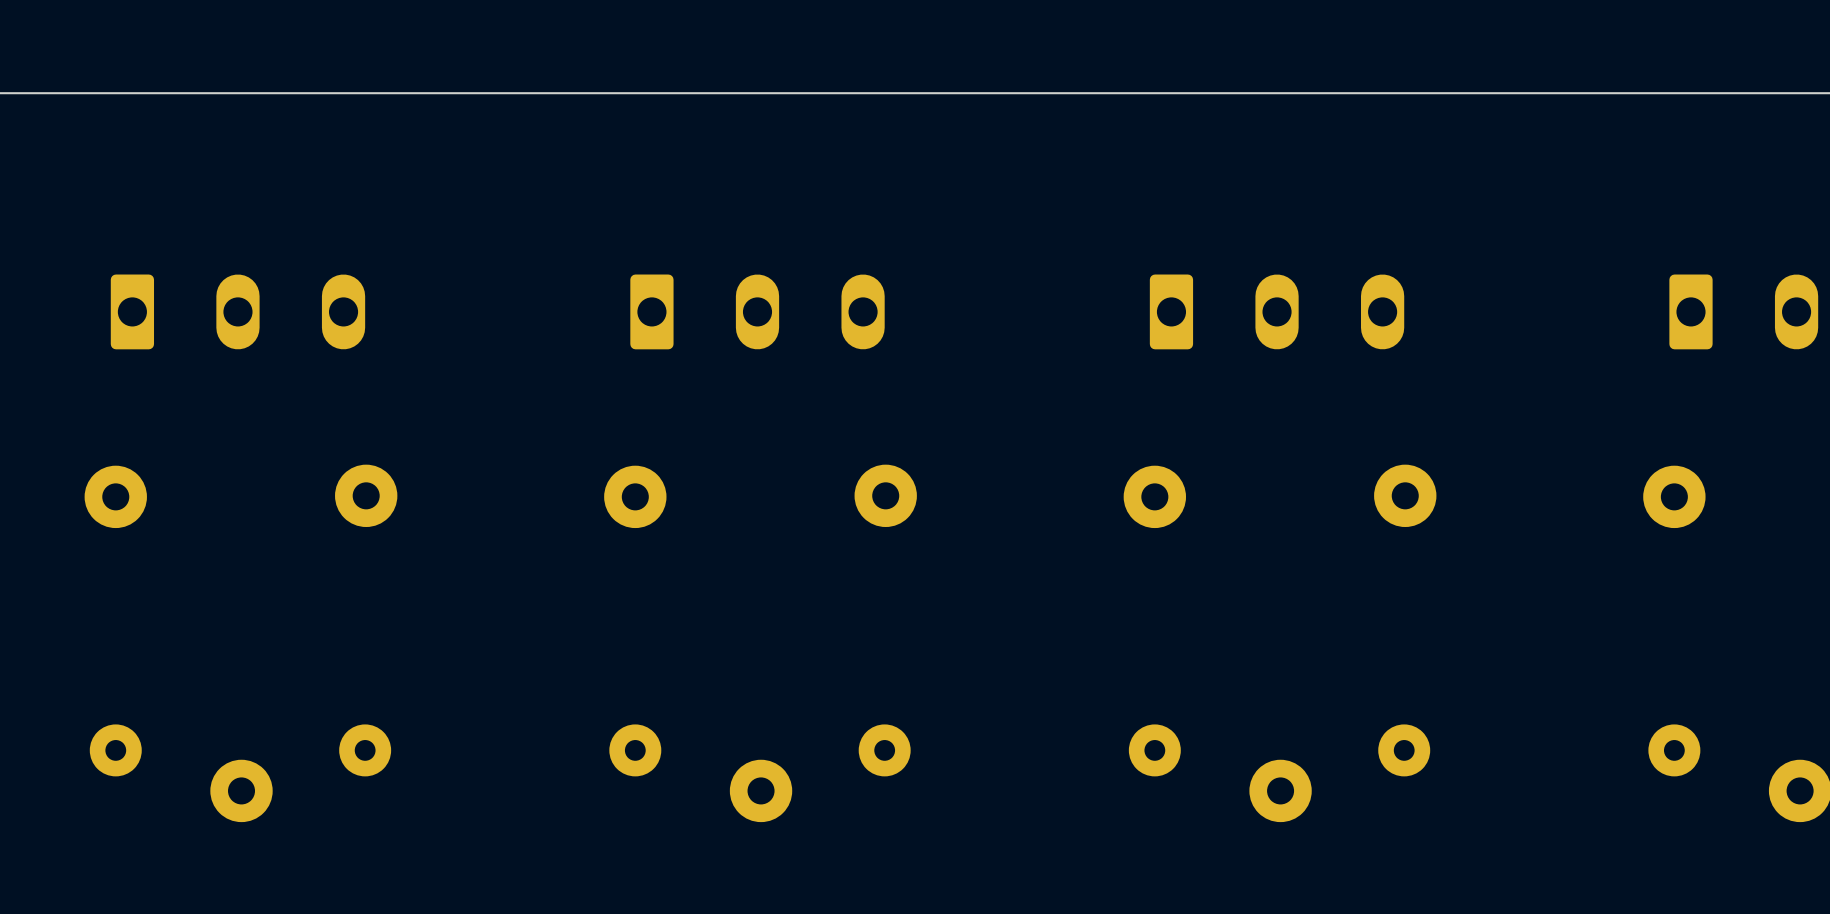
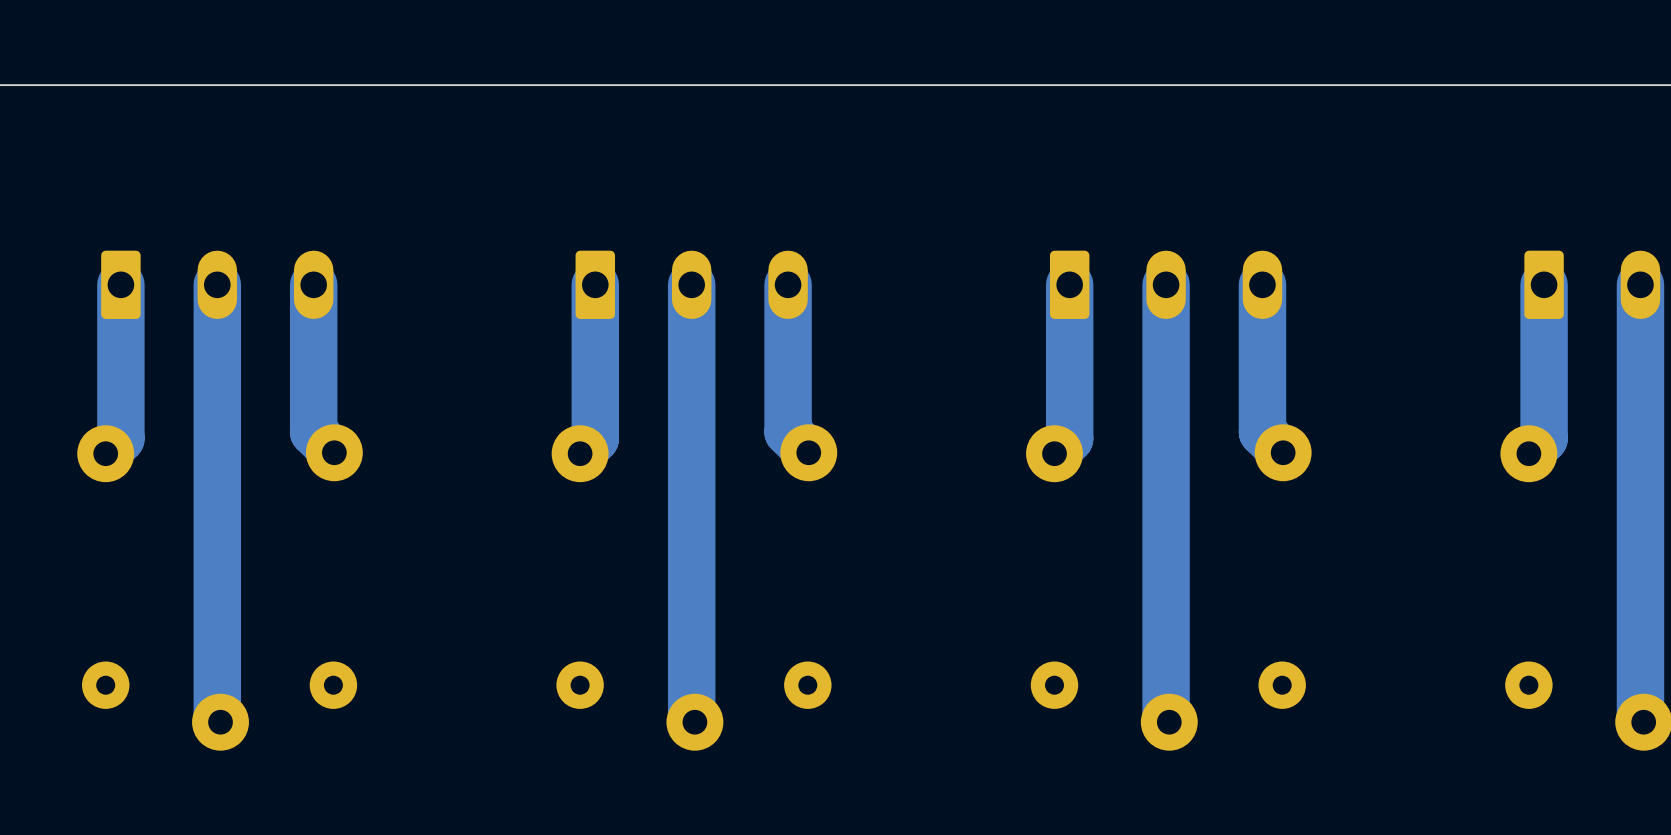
track: none -> (120, 284) (120, 438) (105, 453)
track: none -> (217, 284) (217, 718) (220, 722)
track: none -> (313, 284) (313, 432) (334, 452)
track: none -> (595, 284) (595, 438) (580, 453)
track: none -> (691, 284) (691, 718) (694, 722)
track: none -> (788, 284) (788, 432) (808, 452)
track: none -> (1069, 284) (1069, 438) (1054, 453)
track: none -> (1166, 284) (1166, 718) (1169, 722)
track: none -> (1262, 284) (1262, 432) (1283, 452)
track: none -> (1544, 284) (1544, 438) (1528, 453)
track: none -> (1640, 284) (1640, 718) (1643, 722)

